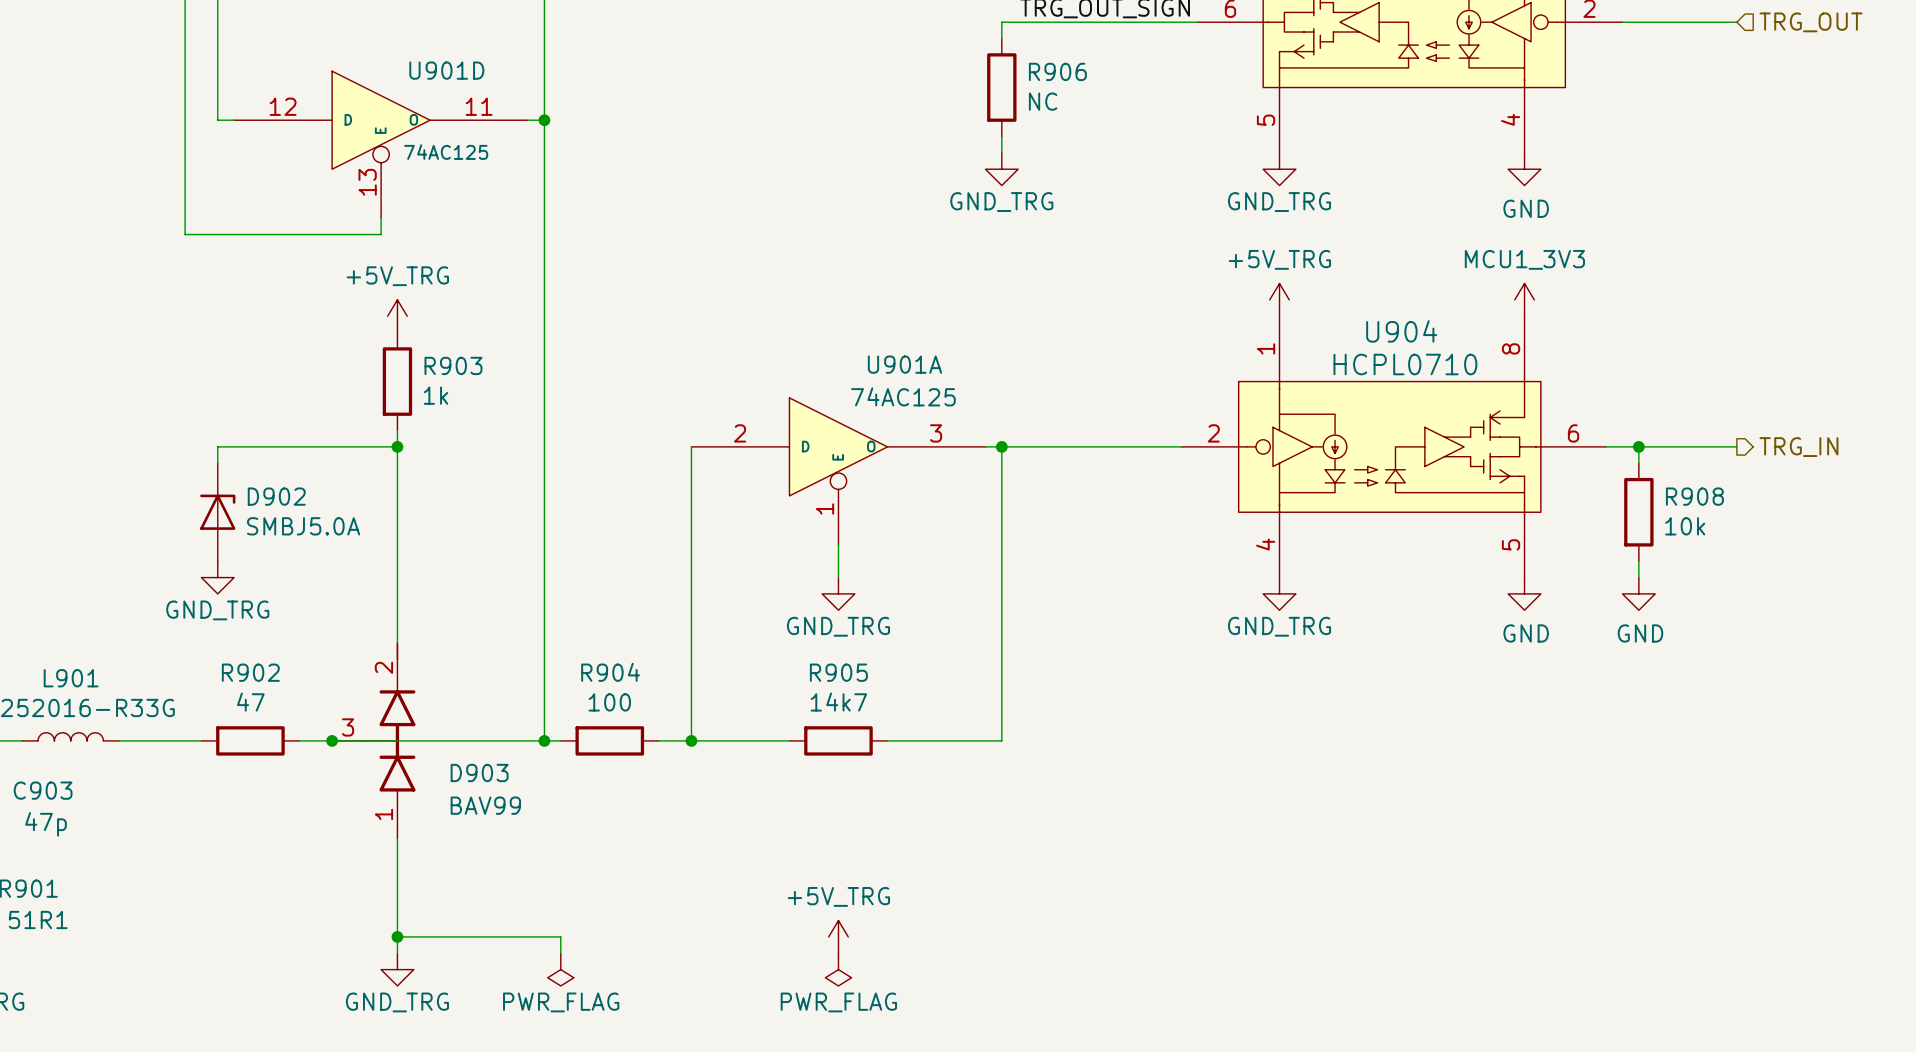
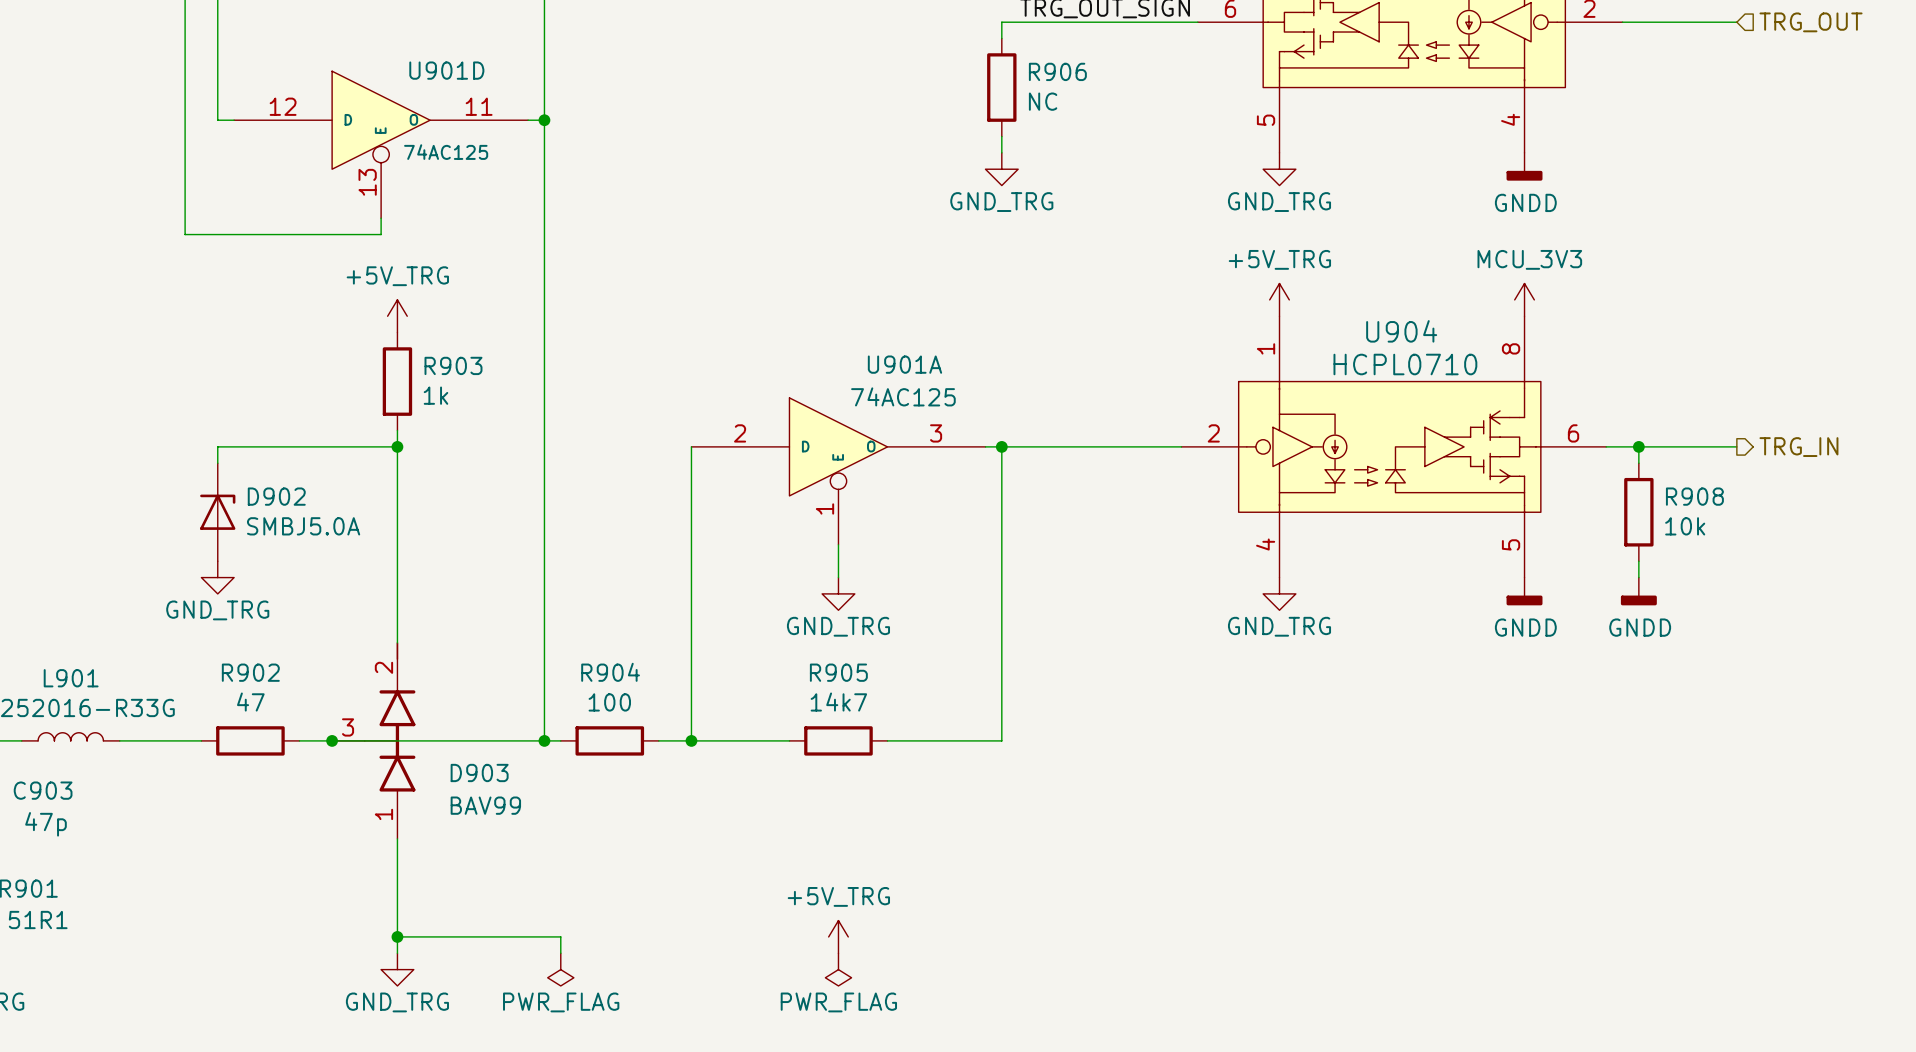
power symbol: GND (1524, 169) -> GNDD (1524, 166)
power symbol: MCU1_3V3 (1524, 299) -> MCU_3V3 (1524, 299)
power symbol: GND (1524, 593) -> GNDD (1524, 591)
power symbol: GND (1638, 593) -> GNDD (1638, 591)

